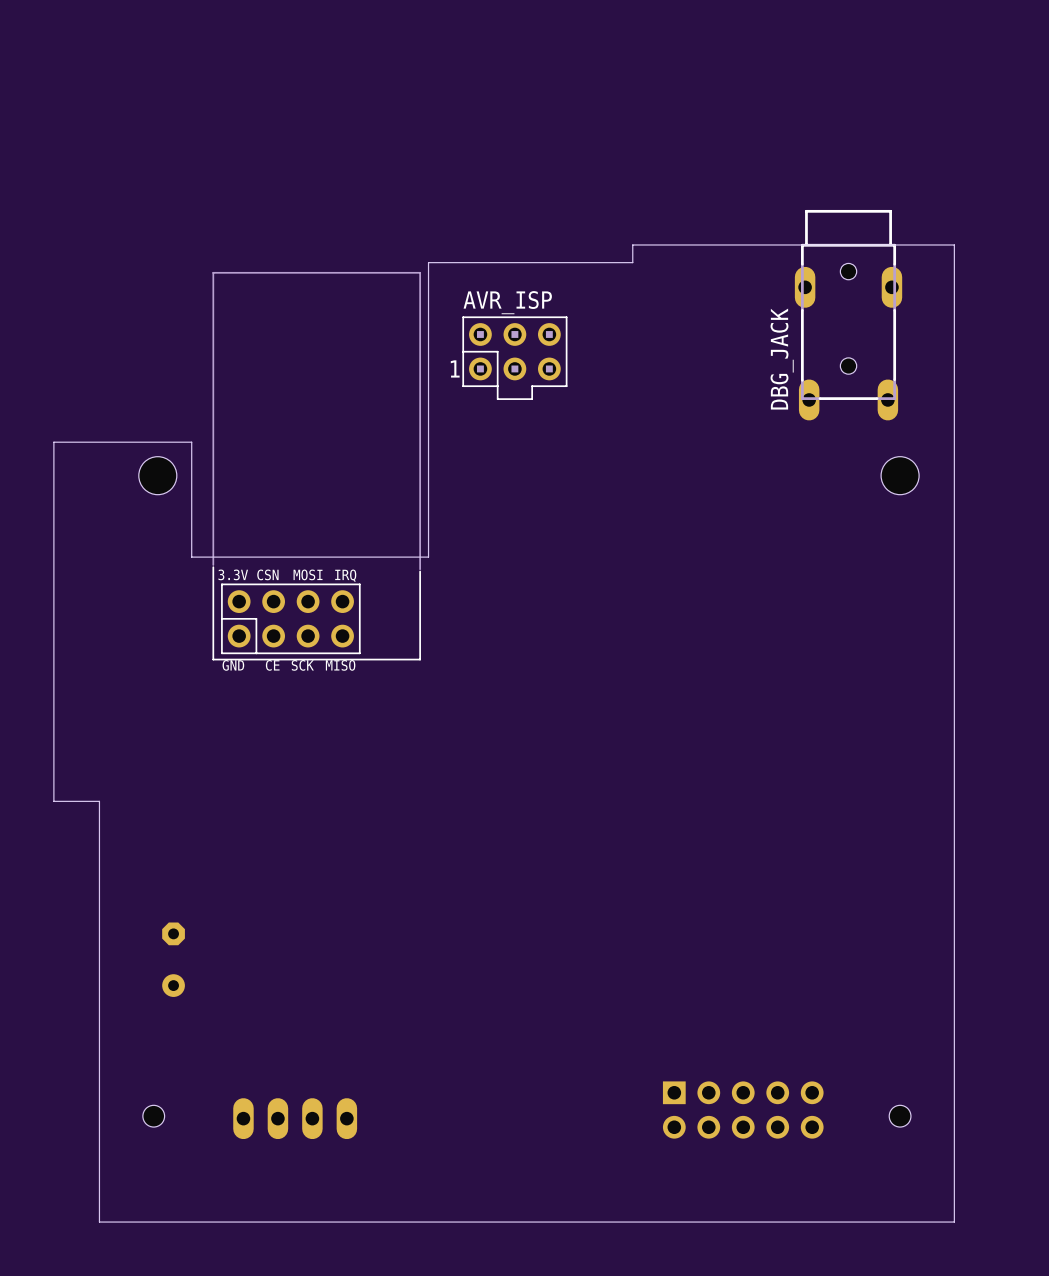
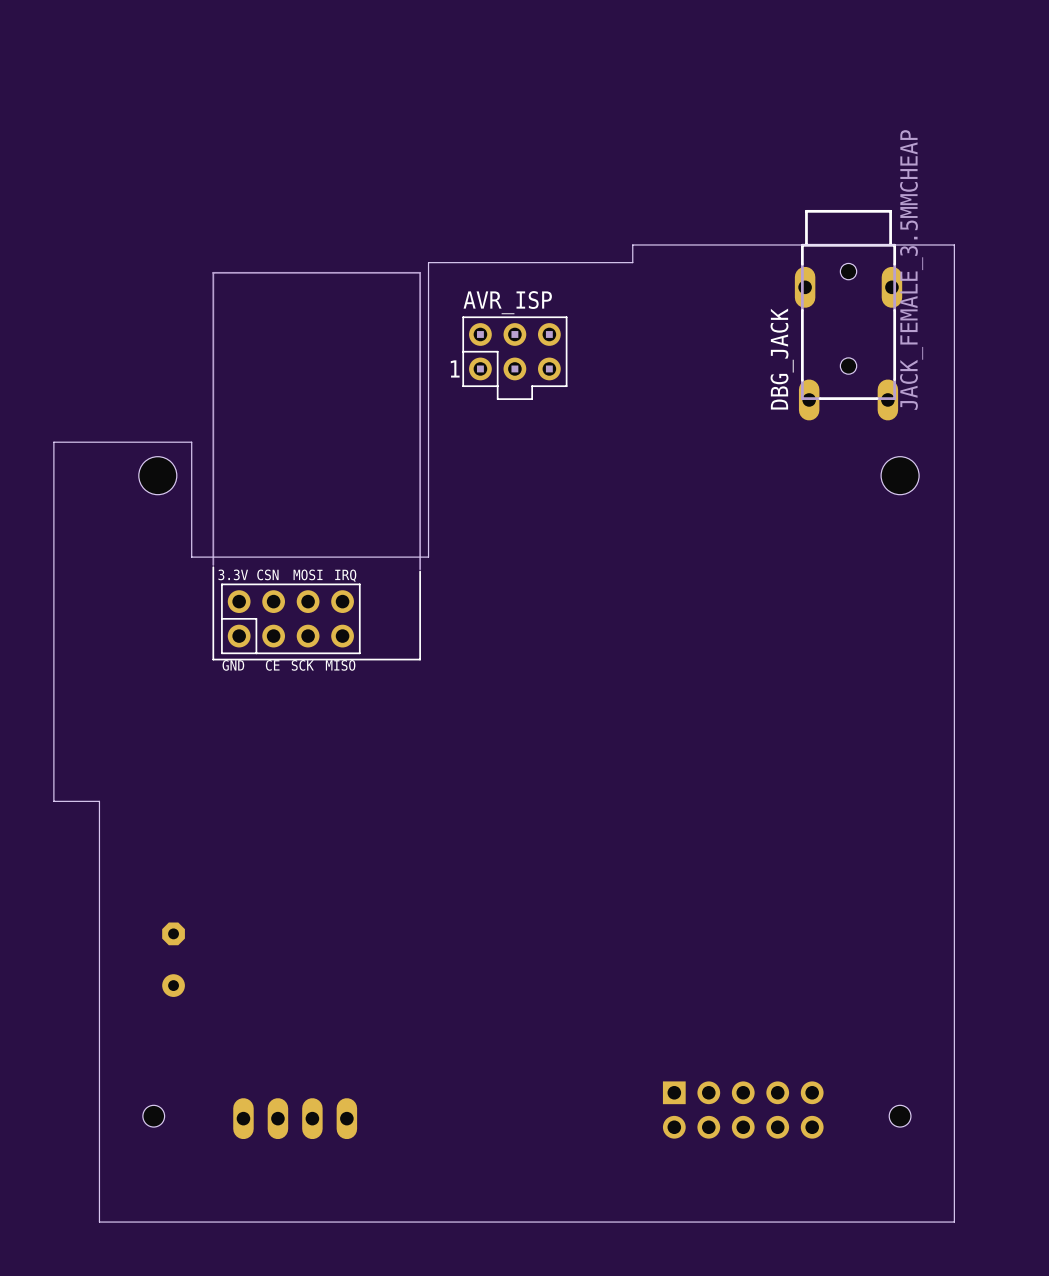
DBG_JACK value: none -> JACK_FEMALE_3.5MMCHEAP (911, 270)

